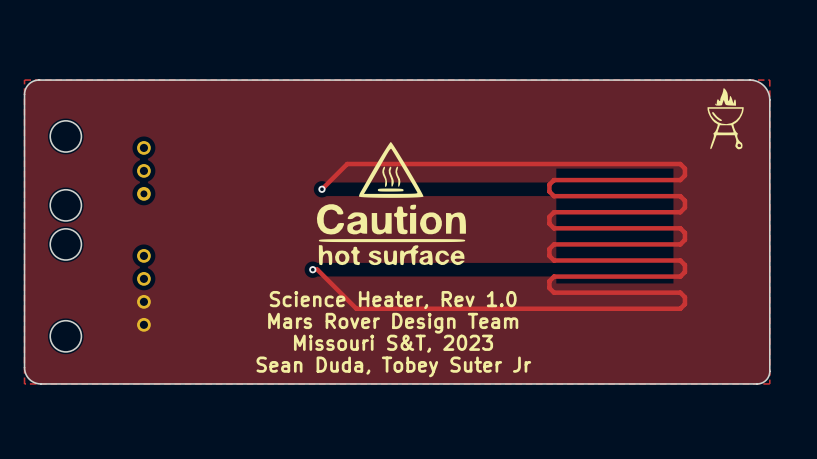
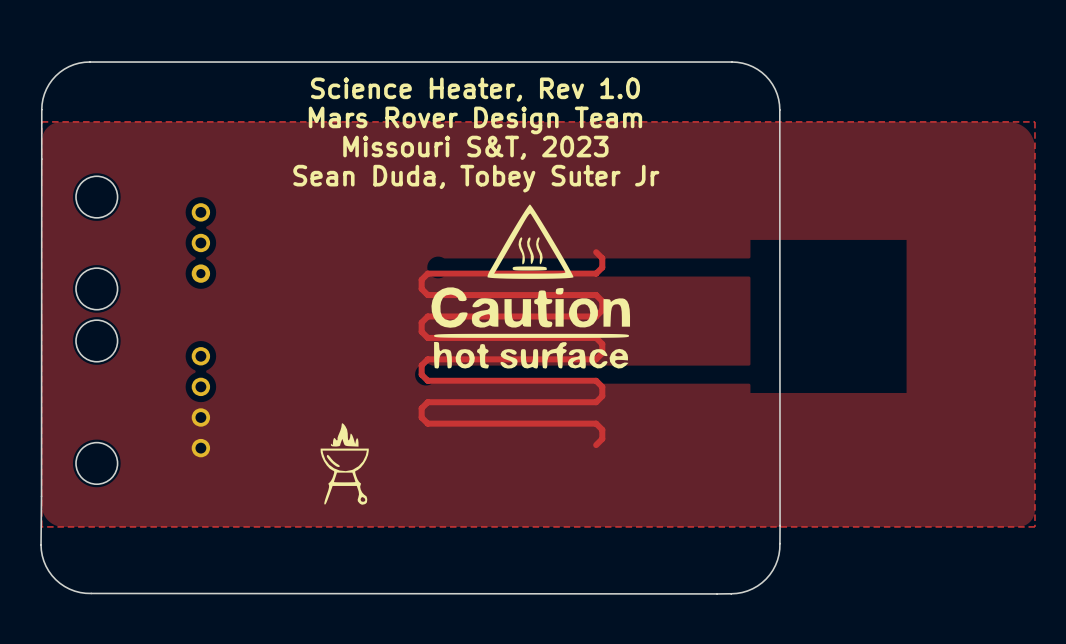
text: none -> Science Heater, Rev 1.0 (475, 89)
text: none -> Mars Rover Design Team (475, 120)
drawing: [707, 88, 744, 150] -> none
board edge: (24, 94) (28, 84) (39, 80) (756, 81) (766, 89) (769, 99) (768, 376) (763, 382) (757, 383) (34, 382) (27, 377) (24, 367) (24, 107) -> (41, 141) (42, 104) (46, 88) (59, 72) (73, 64) (84, 62) (732, 62) (747, 64) (757, 69) (772, 84) (777, 94) (779, 109) (779, 543) (777, 560) (772, 570) (757, 586) (747, 590) (731, 593) (91, 593) (74, 591) (64, 586) (48, 571) (43, 561) (41, 544) (41, 159)
text: none -> Missouri S&T, 2023 (475, 147)
text: none -> Sean Duda, Tobey Suter Jr (476, 178)
track: none -> (596, 252) (602, 258) (602, 267) (596, 273) (427, 273) (421, 279) (421, 288) (427, 295) (596, 295) (602, 301) (602, 310) (596, 316) (427, 316) (421, 322) (421, 331) (427, 337) (596, 337) (602, 344) (602, 353) (596, 359) (427, 359) (421, 365) (421, 374) (427, 380) (596, 380) (602, 386) (602, 396) (596, 402) (427, 402) (421, 408) (421, 417) (427, 423) (596, 423) (602, 429) (602, 438) (596, 445)
track: (321, 189) (347, 164) (680, 164) (684, 168) (684, 175) (680, 180) (554, 180) (549, 184) (549, 191) (554, 196) (680, 196) (684, 200) (684, 207) (680, 212) (554, 212) (549, 216) (549, 223) (554, 228) (680, 228) (684, 232) (684, 239) (680, 244) (554, 244) (549, 249) (549, 255) (554, 260) (680, 260) (684, 265) (684, 271) (680, 276) (554, 276) (549, 281) (549, 288) (554, 292) (680, 292) (684, 297) (684, 304) (680, 308) (356, 308) (317, 269) (312, 269) -> none
via: (321, 189) -> none
via: (312, 269) -> none
text: Science Heater, Rev 1.0 (393, 300) -> none
drawing: none -> [320, 423, 369, 505]
text: Mars Rover Design Team (393, 323) -> none
text: Missouri S&T, 2023 (393, 343) -> none
text: Sean Duda, Tobey Suter Jr (393, 366) -> none

